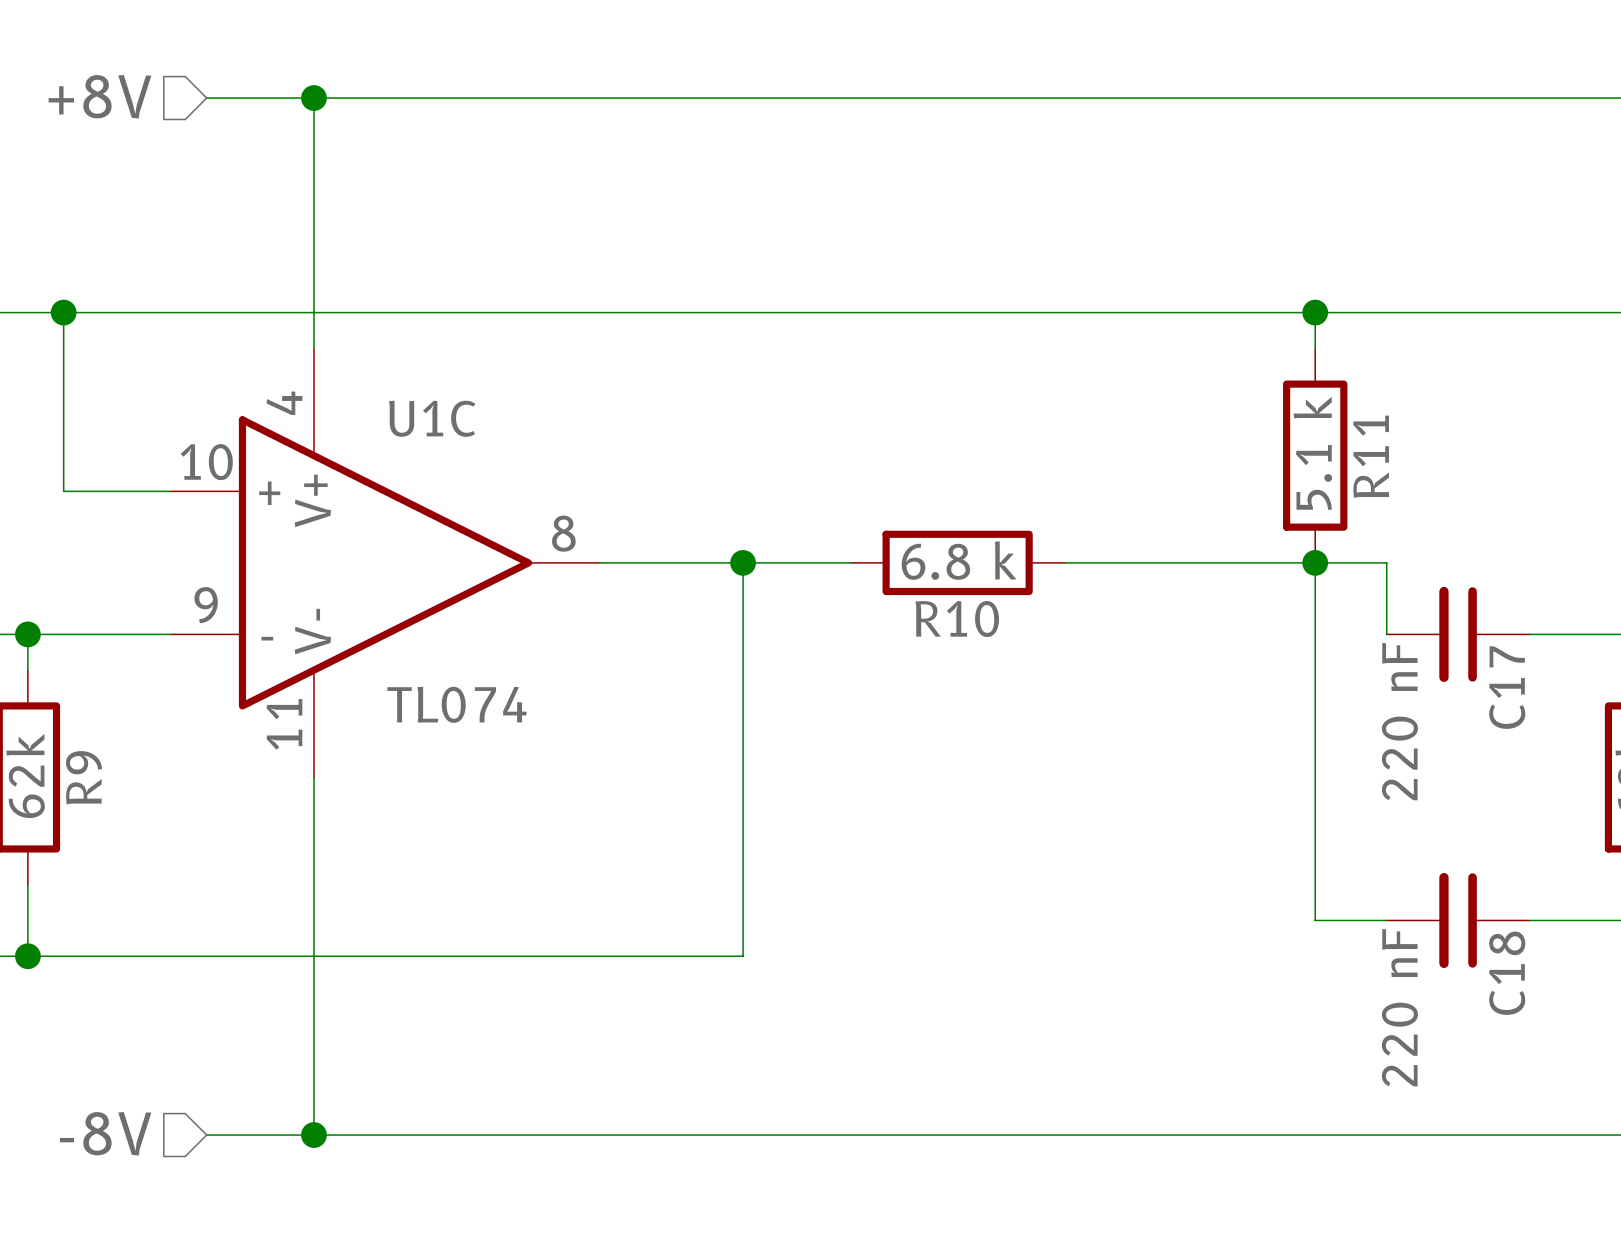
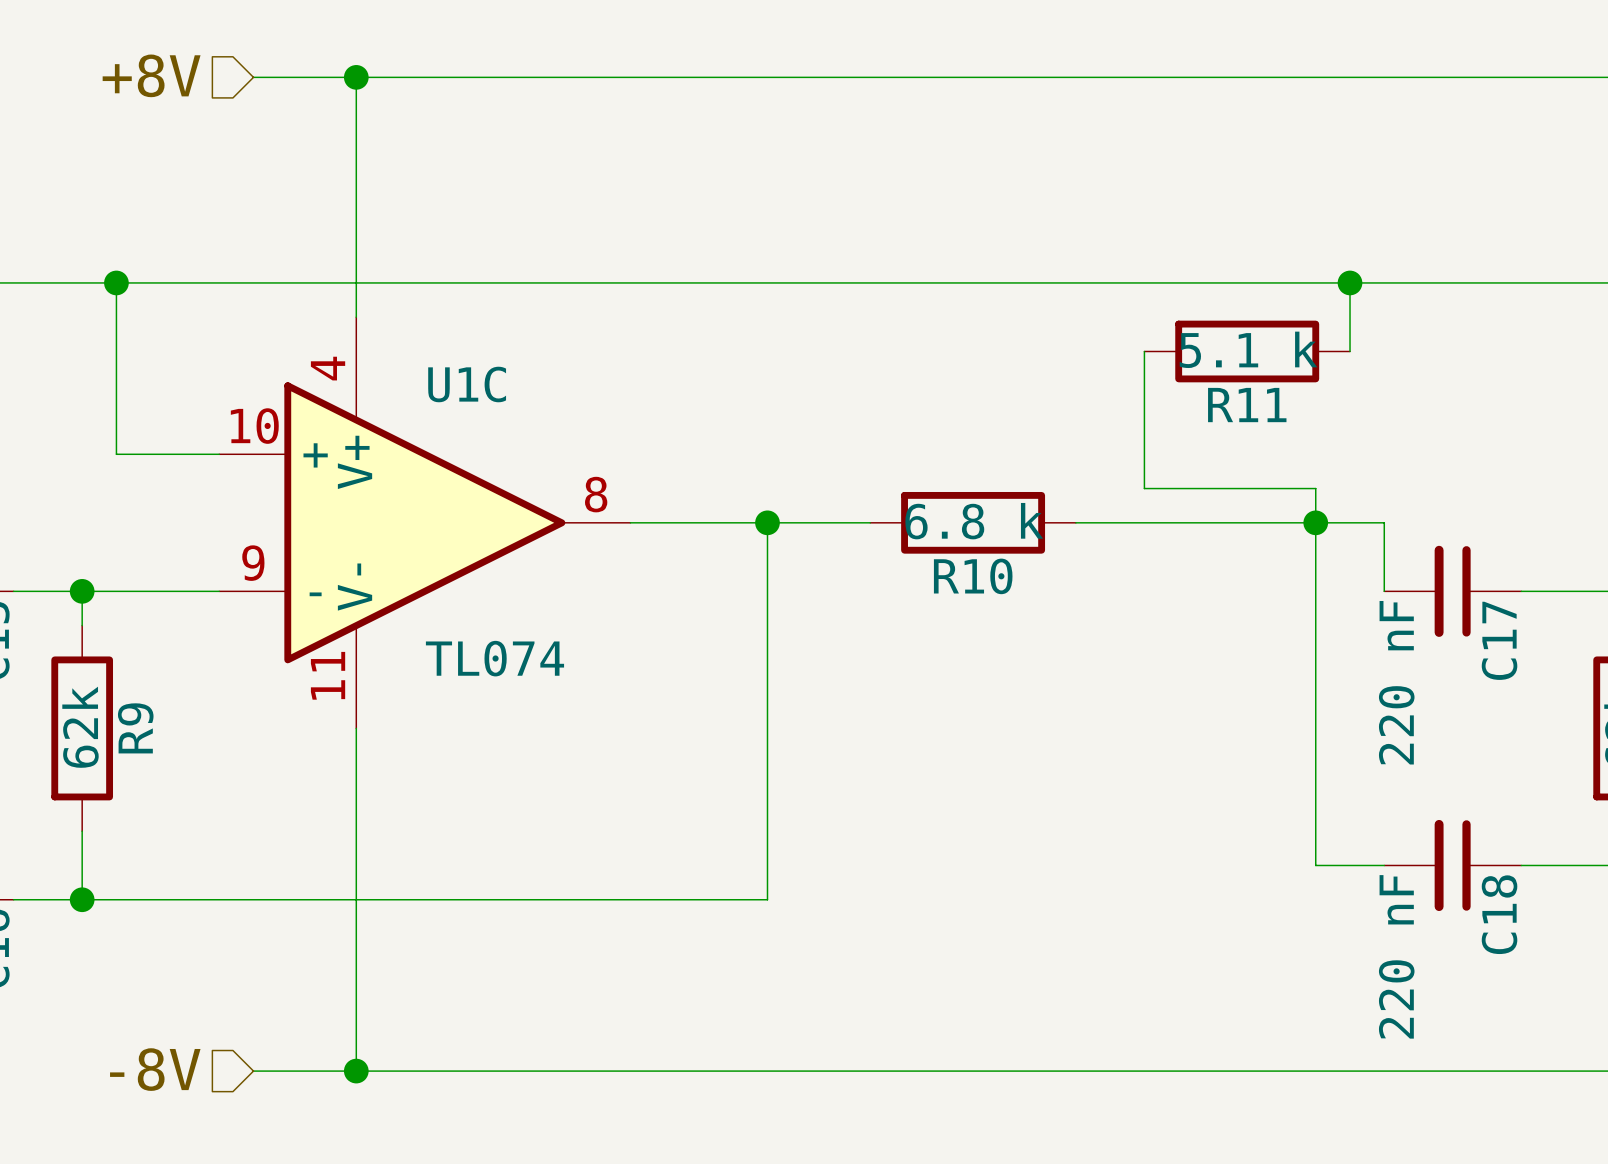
wire: (1315, 312) (1315, 348) -> none
junction position: (1315, 312) -> (1350, 282)
wire: none -> (1350, 282) (1350, 351)
wire: none -> (1144, 351) (1144, 488) (1315, 488) (1315, 522)
R11 rotation: 0° (1315, 455) -> 90° clockwise (1247, 351)

